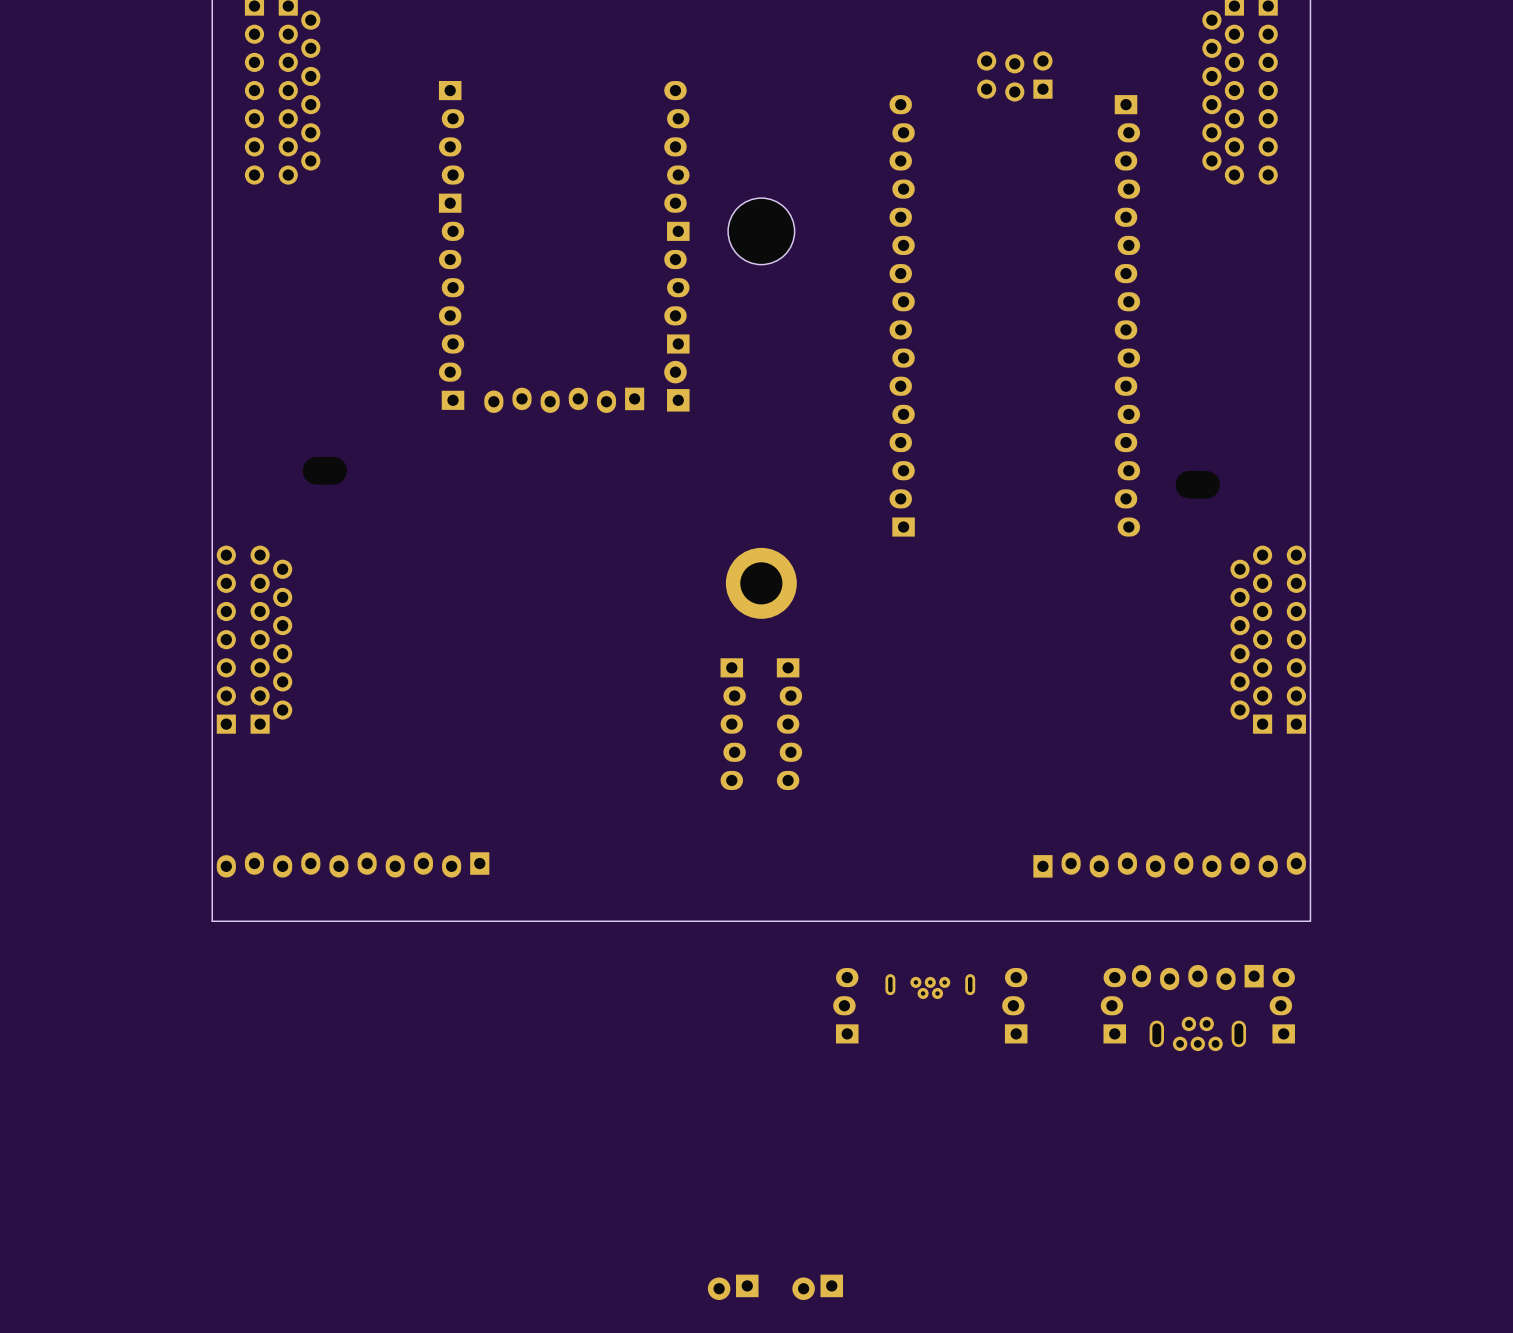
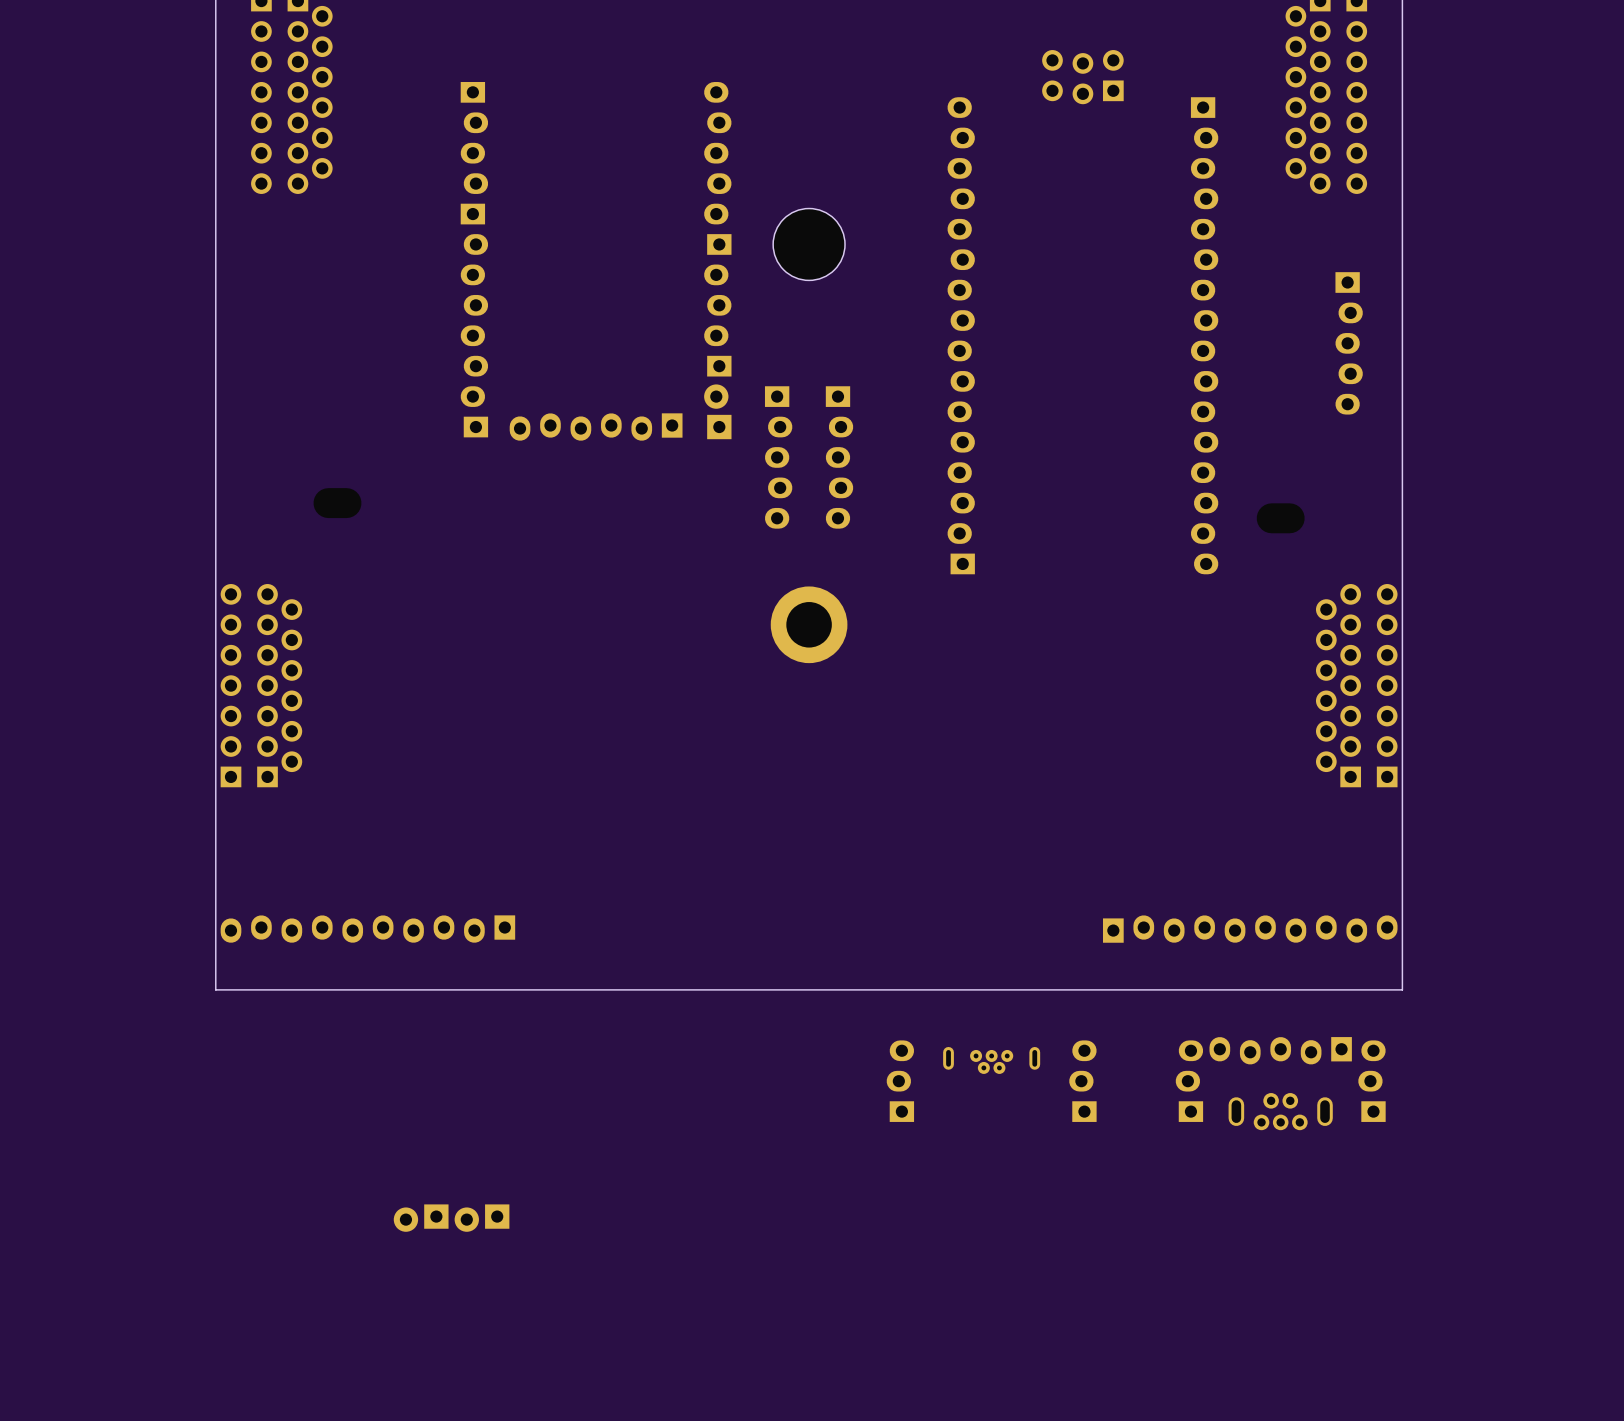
part: none -> (1349, 343)
part: none -> (778, 457)
part: none -> (839, 457)
part: (733, 724) -> none
part: (789, 724) -> none
part: none -> (421, 1218)
part: none -> (482, 1218)
part: (733, 1287) -> none
part: (817, 1287) -> none

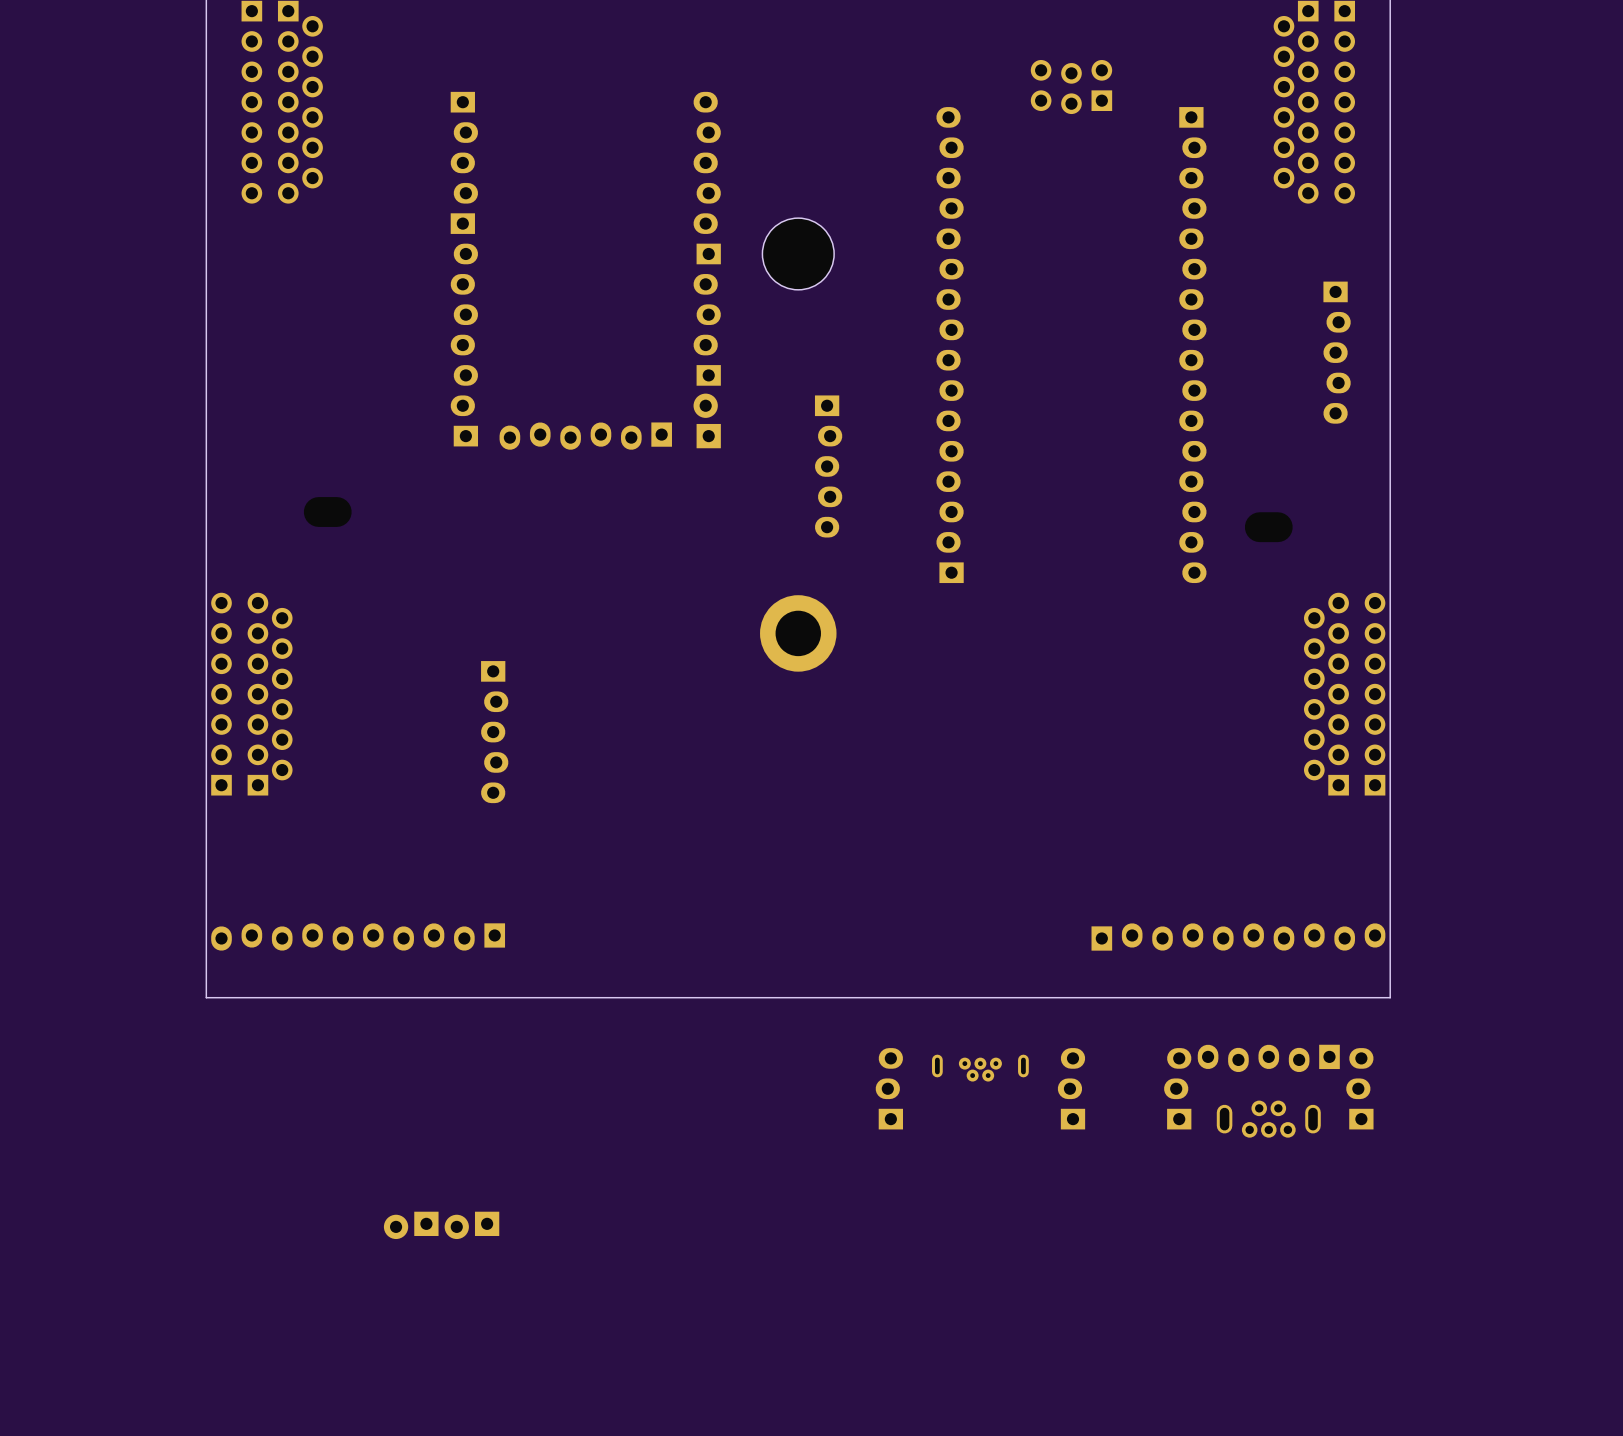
part: (778, 457) -> none
part: none -> (494, 732)

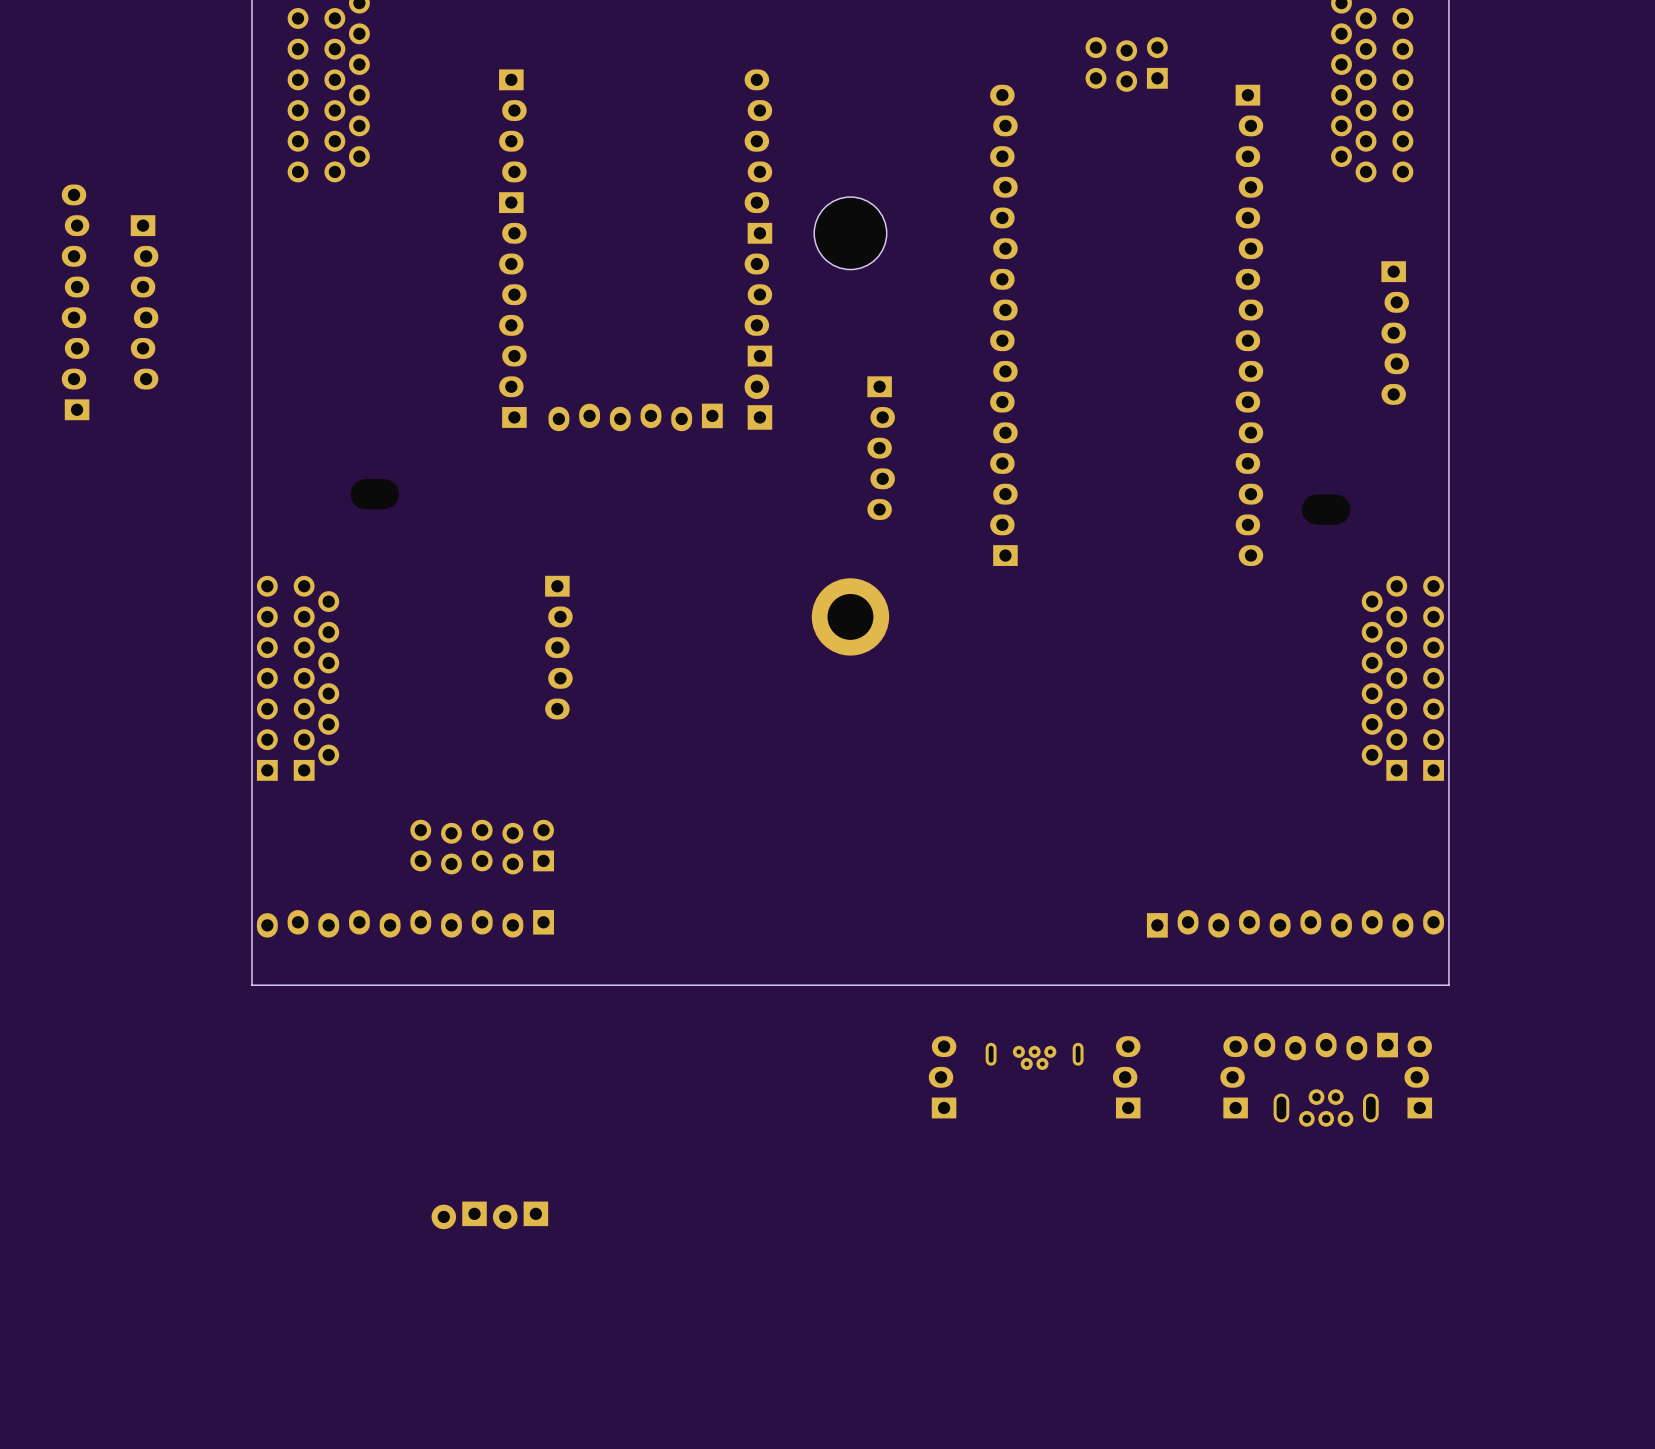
part: none -> (75, 302)
part: none -> (144, 302)
part position: (494, 732) -> (558, 647)
part: none -> (482, 847)

